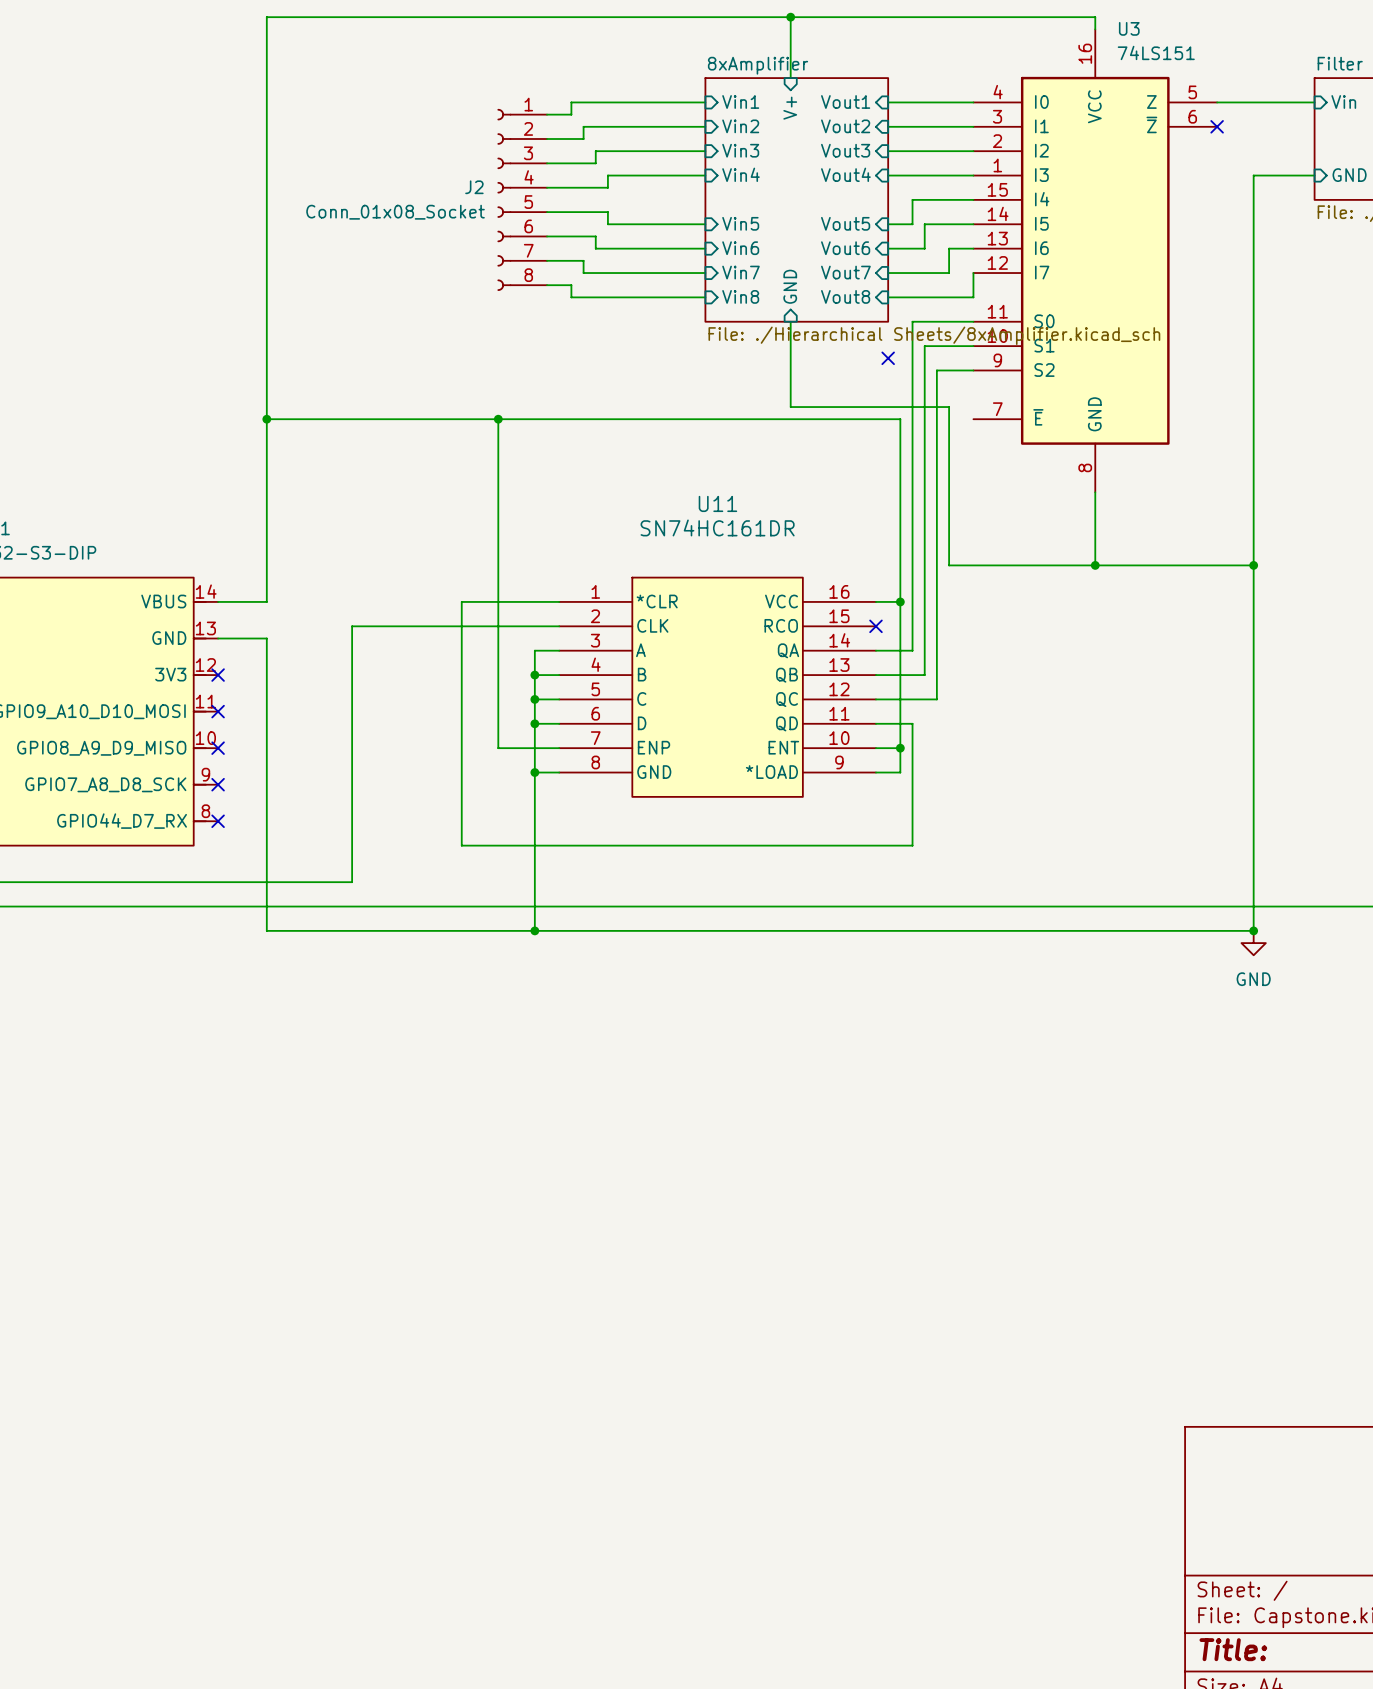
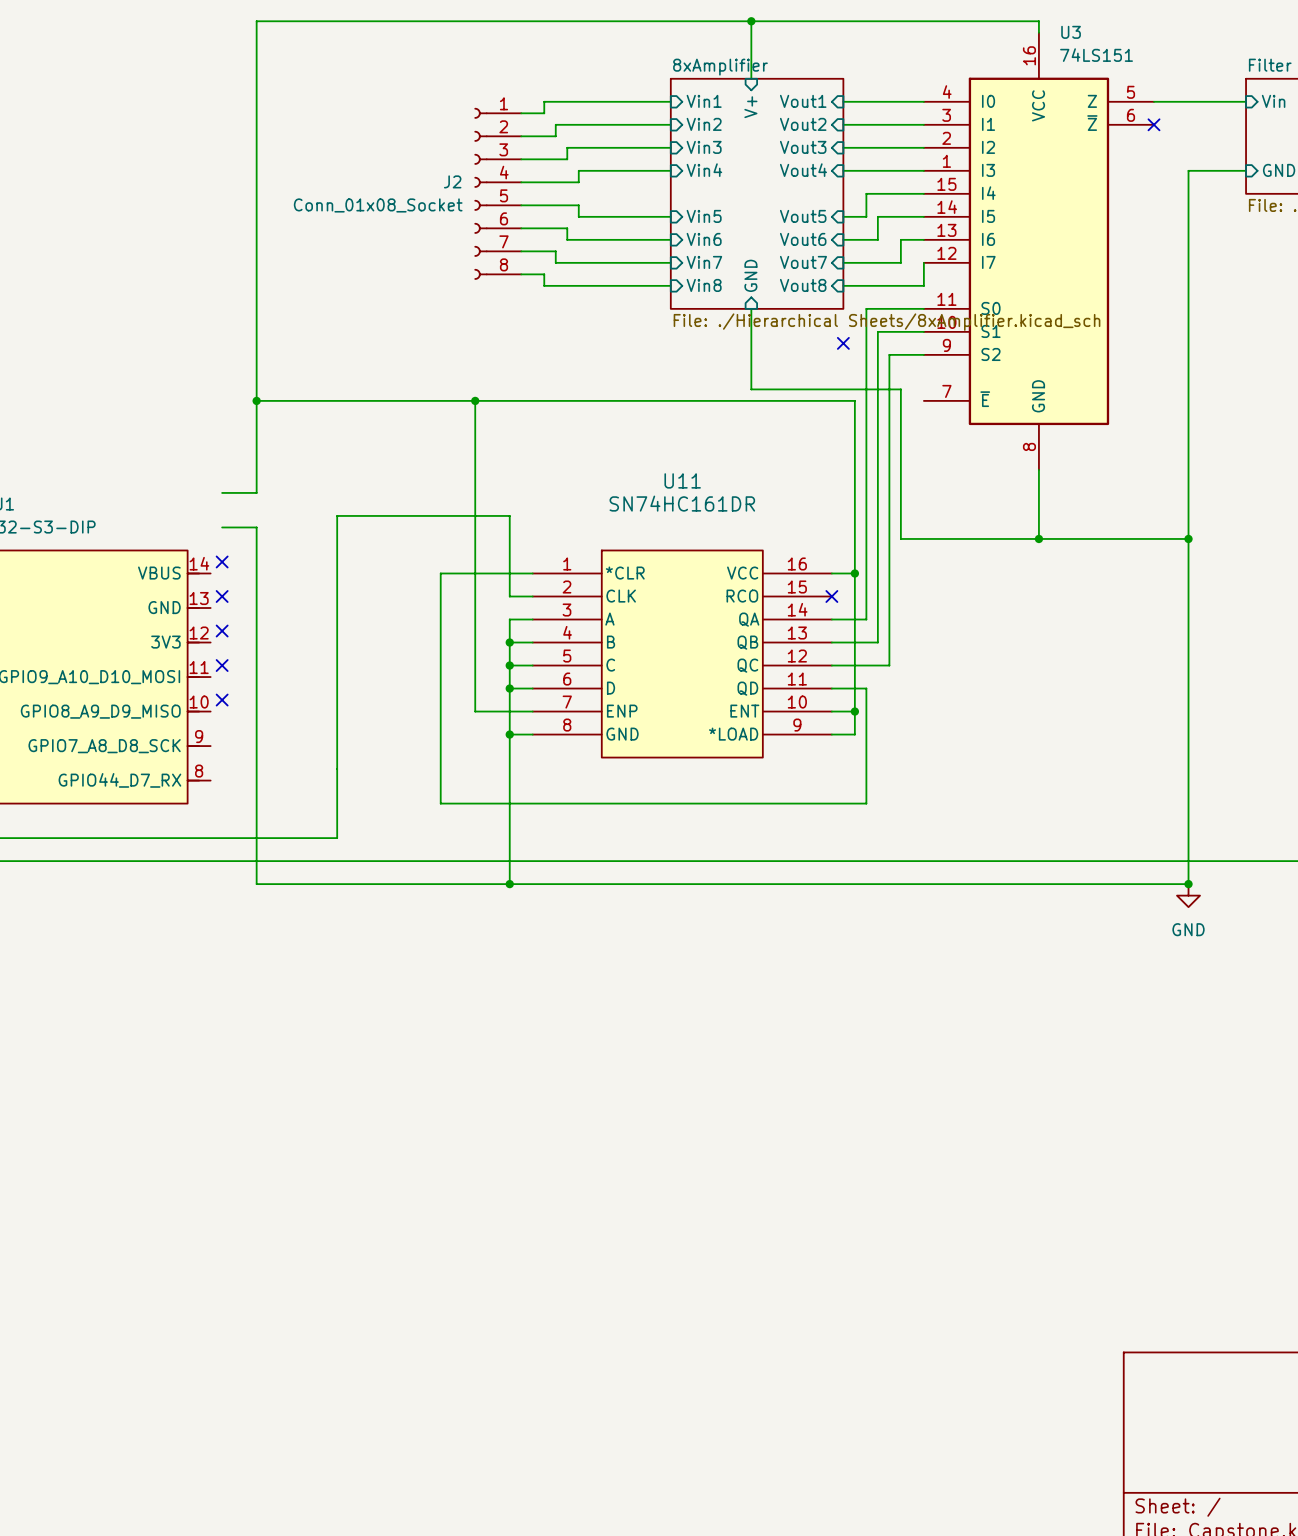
wire: (266, 516) (266, 553) -> (256, 492) (222, 492)
wire: none -> (222, 527) (256, 527)
no-connect mark: none -> (222, 561)
wire: (218, 601) (266, 601) -> (256, 608) (256, 573)
no-connect mark: none -> (222, 596)
wire: (352, 626) (534, 626) -> (337, 596) (337, 515) (509, 515) (509, 596)
wire: (218, 638) (266, 638) -> none
no-connect mark: none -> (222, 631)
no-connect mark: (218, 675) -> none
no-connect mark: none -> (222, 665)
no-connect mark: (218, 711) -> none
no-connect mark: none -> (222, 700)
no-connect mark: (218, 748) -> none
no-connect mark: (218, 784) -> none
no-connect mark: (218, 821) -> none

